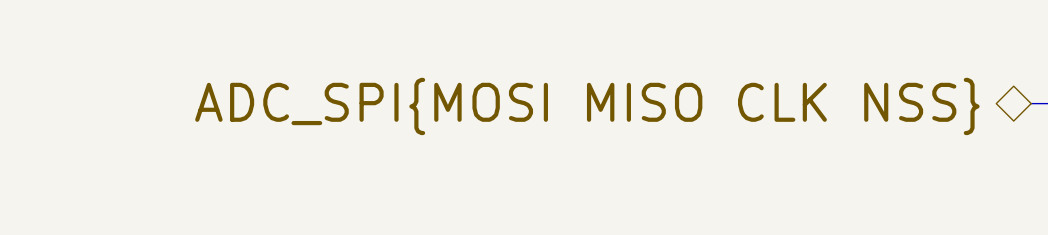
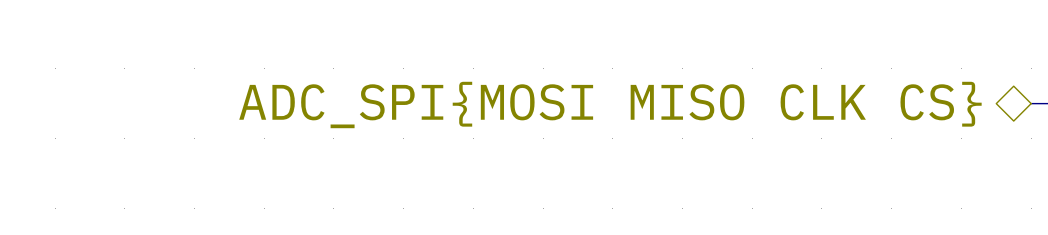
hierarchical label: ADC_SPI{MOSI MISO CLK NSS} (587, 106) -> ADC_SPI{MOSI MISO CLK CS} (610, 104)

